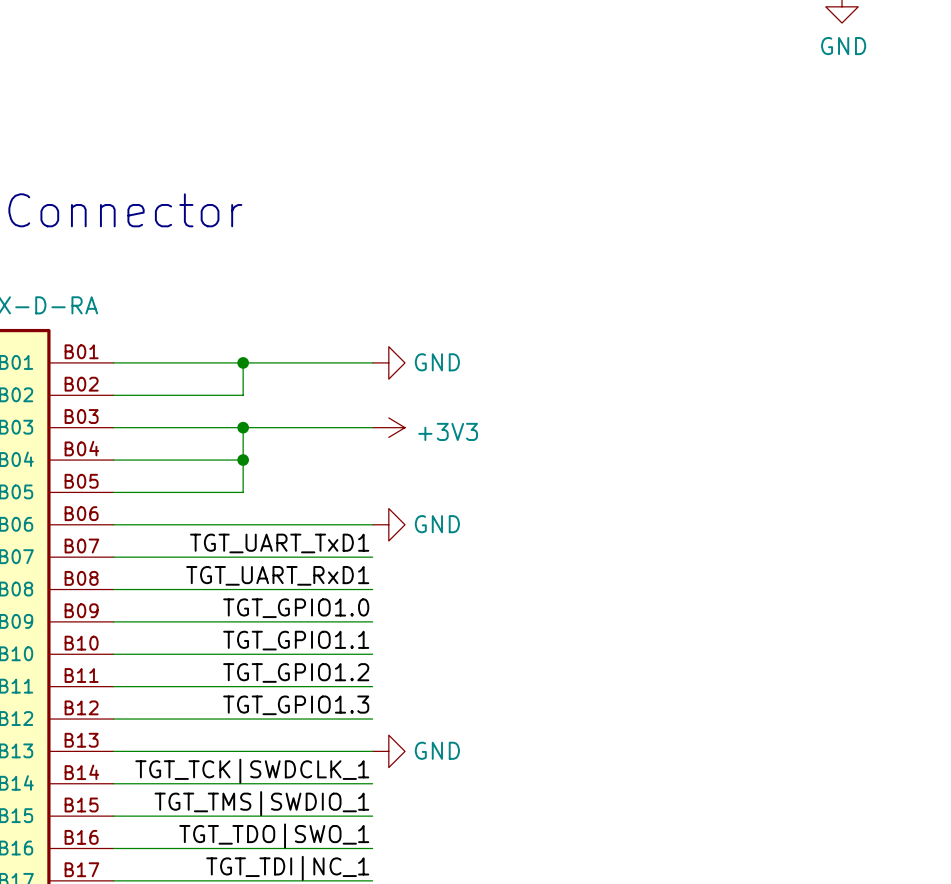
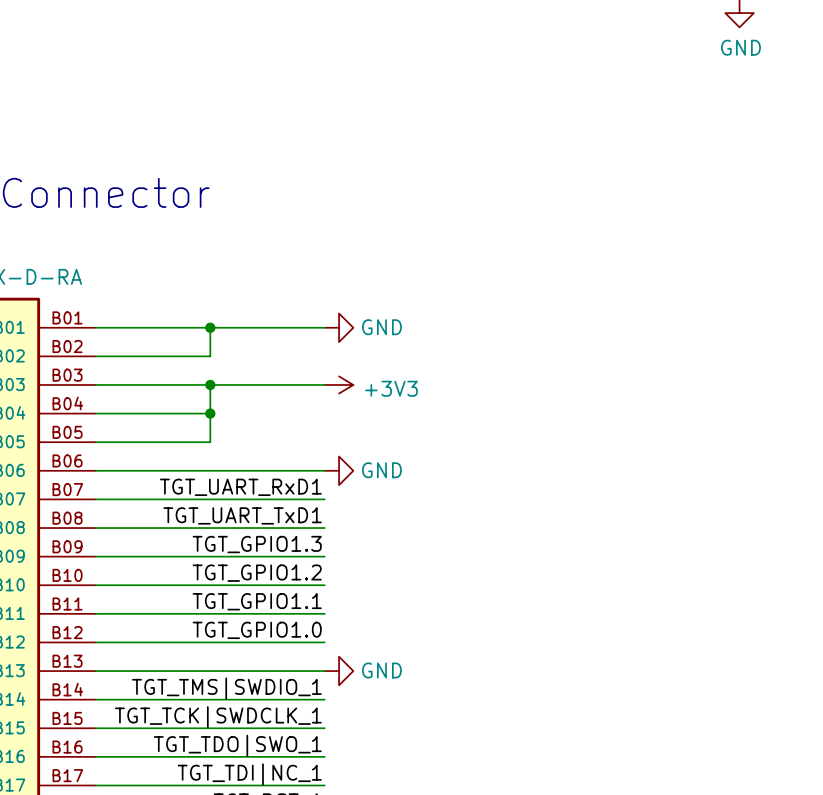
label: TGT_UART_TxD1 (279, 543) -> TGT_UART_RxD1 (240, 487)
label: TGT_UART_RxD1 (277, 575) -> TGT_UART_TxD1 (242, 515)
label: TGT_GPIO1.0 (296, 608) -> TGT_GPIO1.3 (257, 544)
label: TGT_GPIO1.1 (296, 640) -> TGT_GPIO1.2 (257, 573)
label: TGT_GPIO1.2 (296, 672) -> TGT_GPIO1.1 (257, 601)
label: TGT_GPIO1.3 (296, 705) -> TGT_GPIO1.0 (257, 630)
label: TGT_TCK|SWDCLK_1 (252, 771) -> TGT_TMS|SWDIO_1 (226, 688)
label: TGT_TMS|SWDIO_1 (261, 803) -> TGT_TCK|SWDCLK_1 (218, 717)

